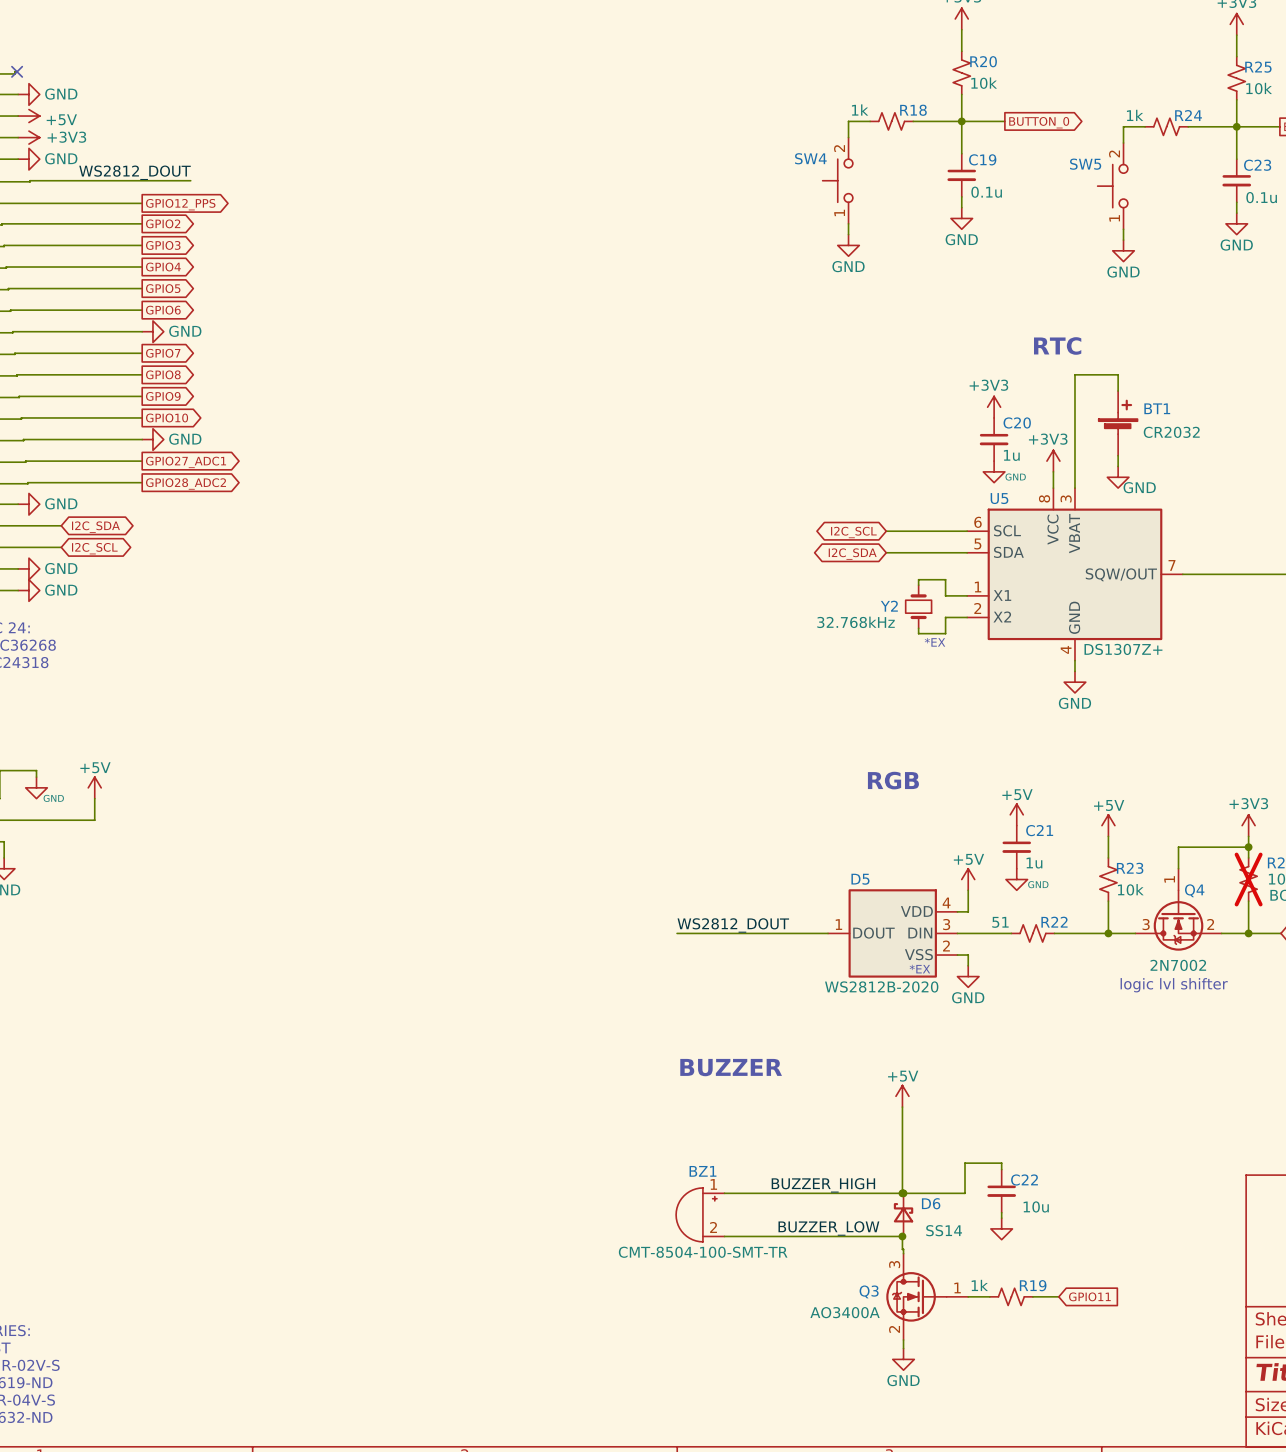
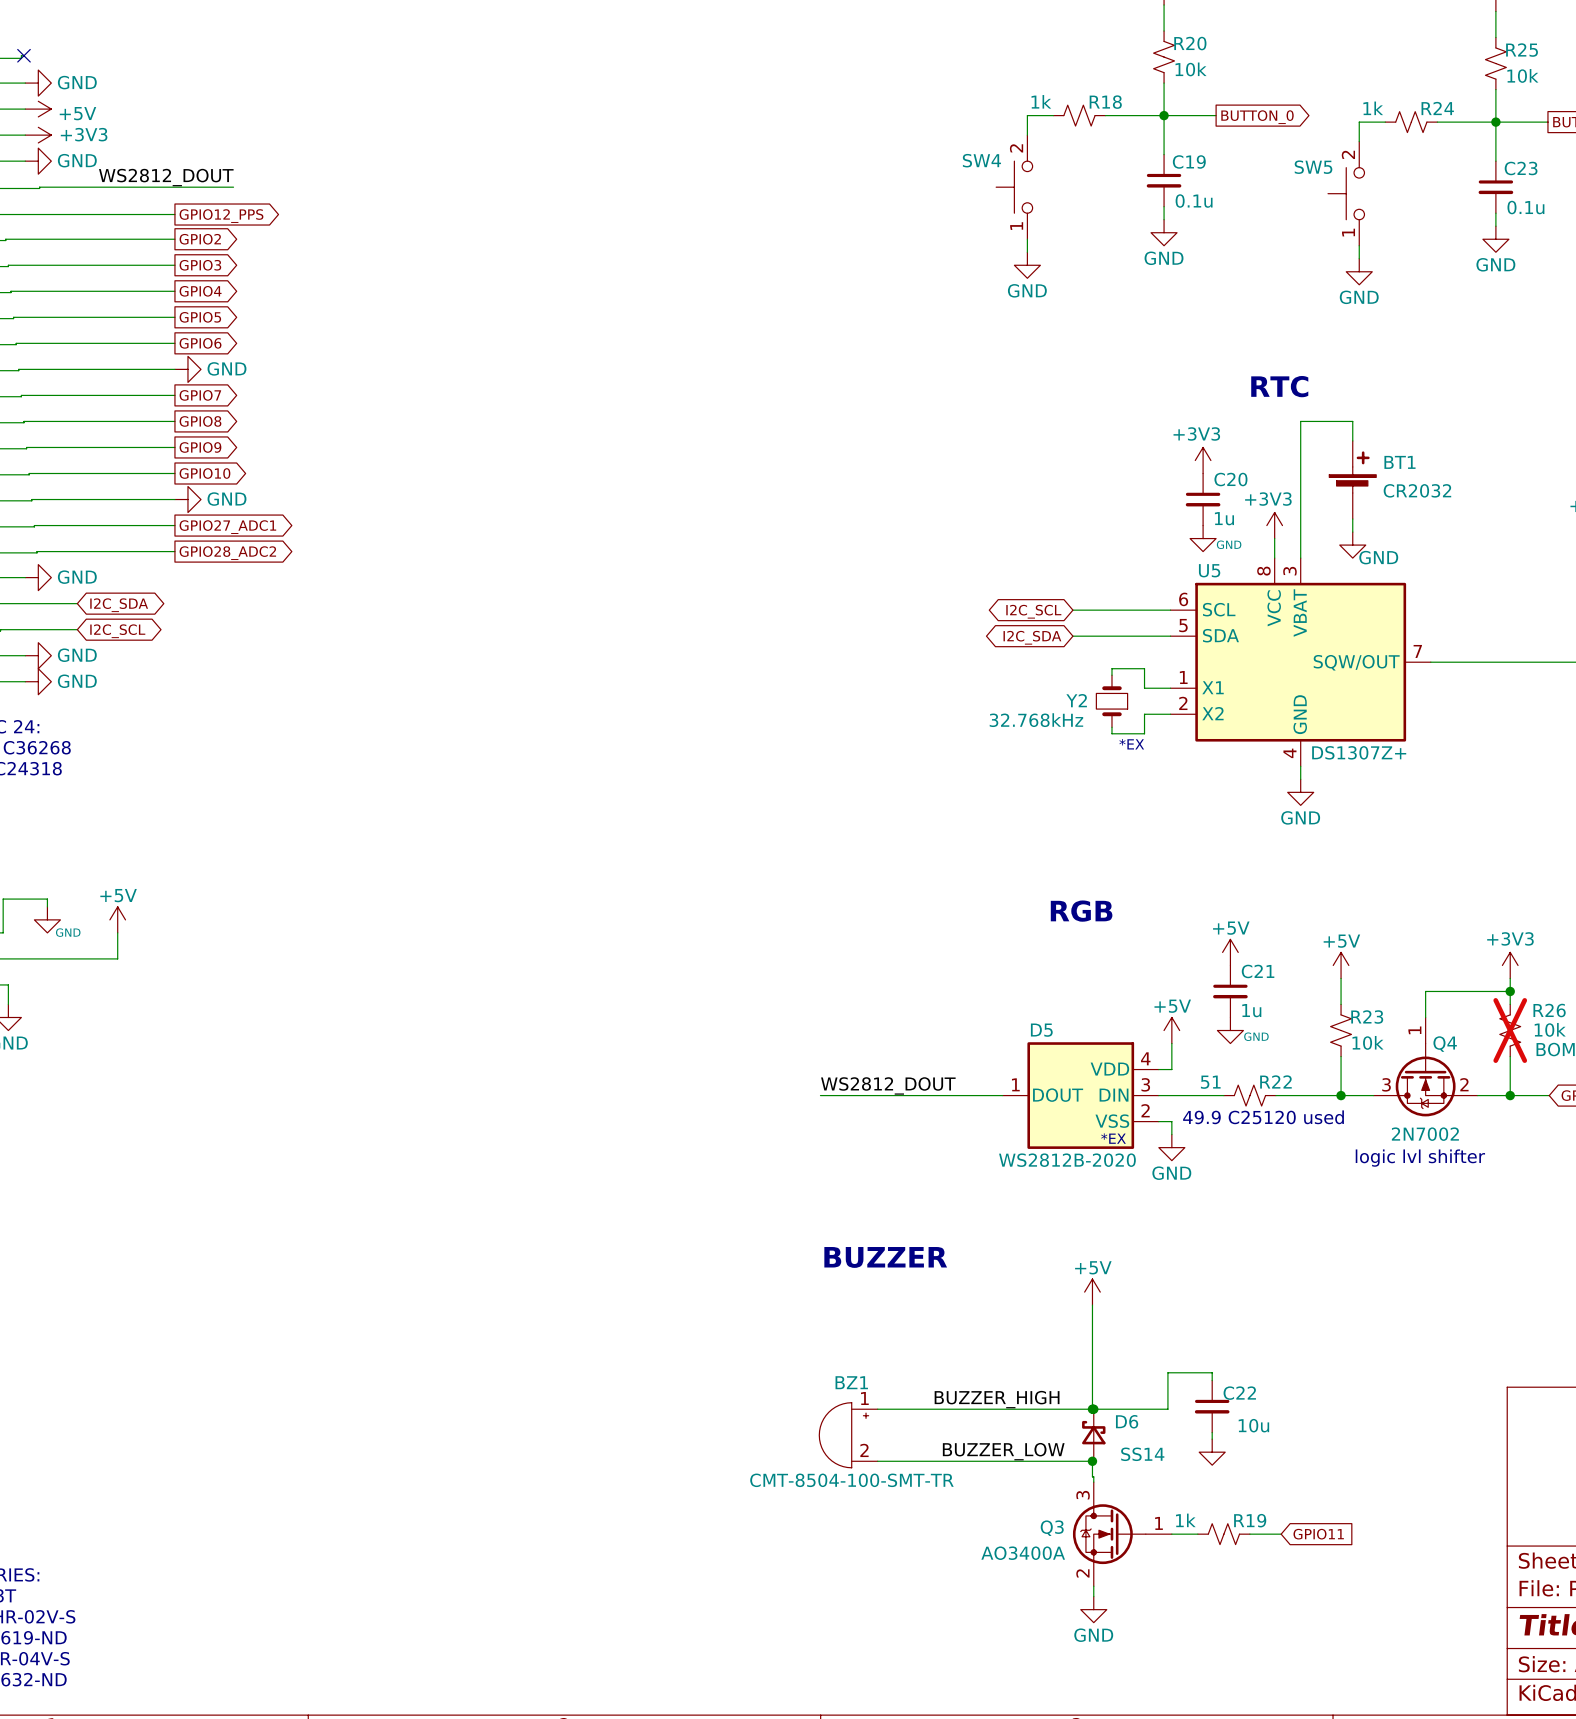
text: none -> 49.9 C25120 used (1263, 1117)

